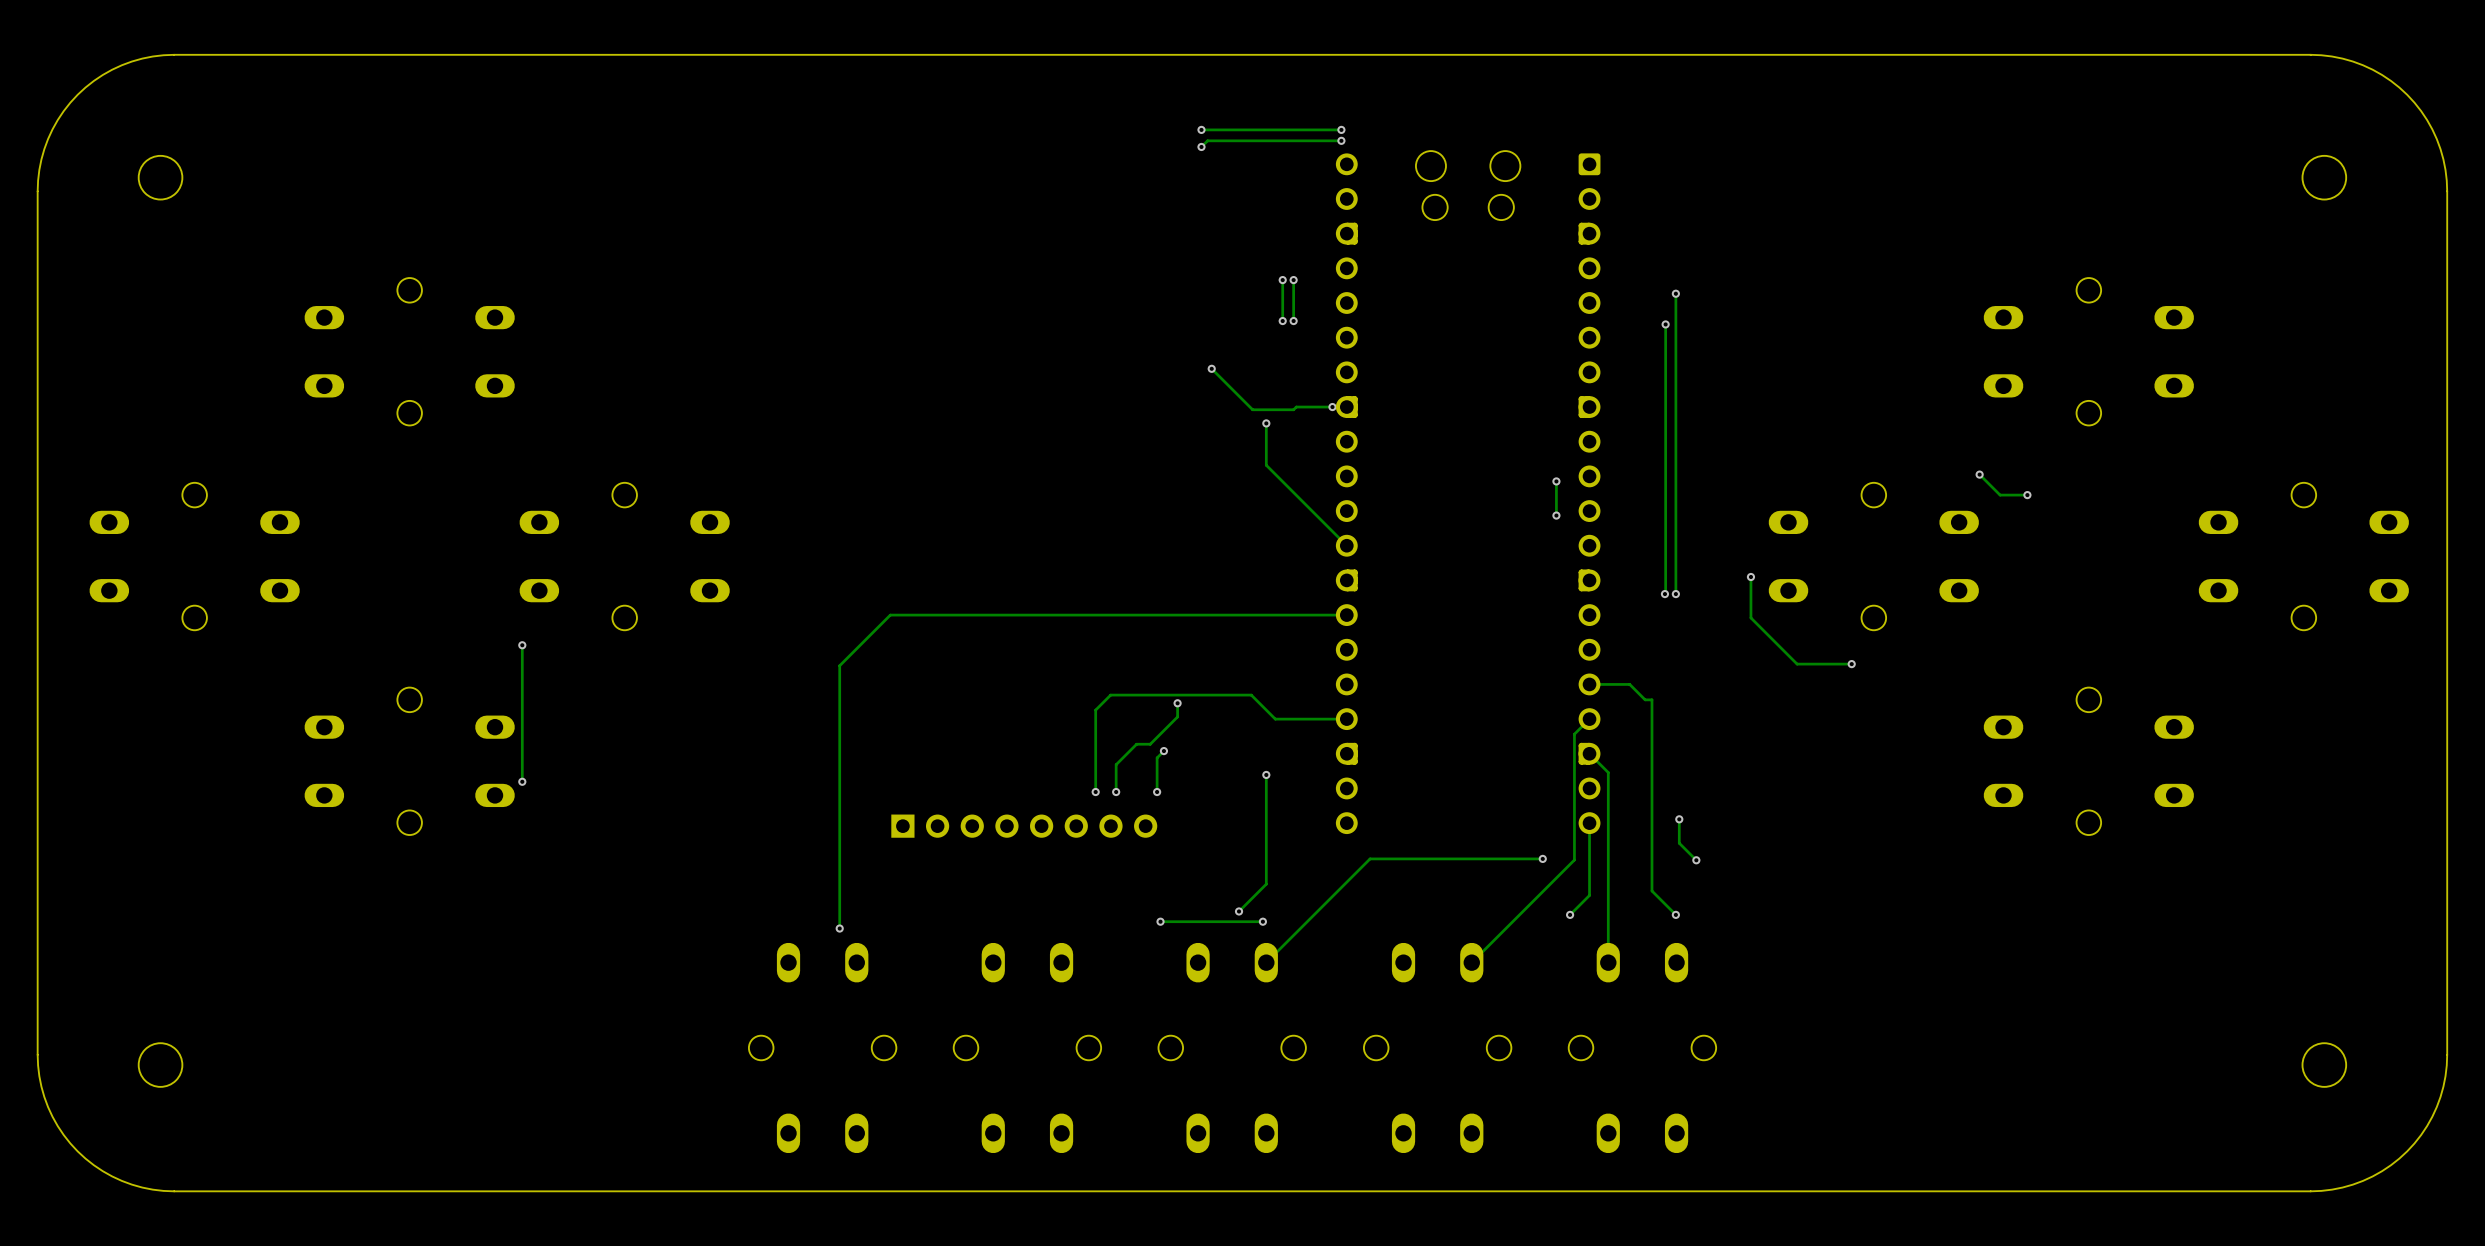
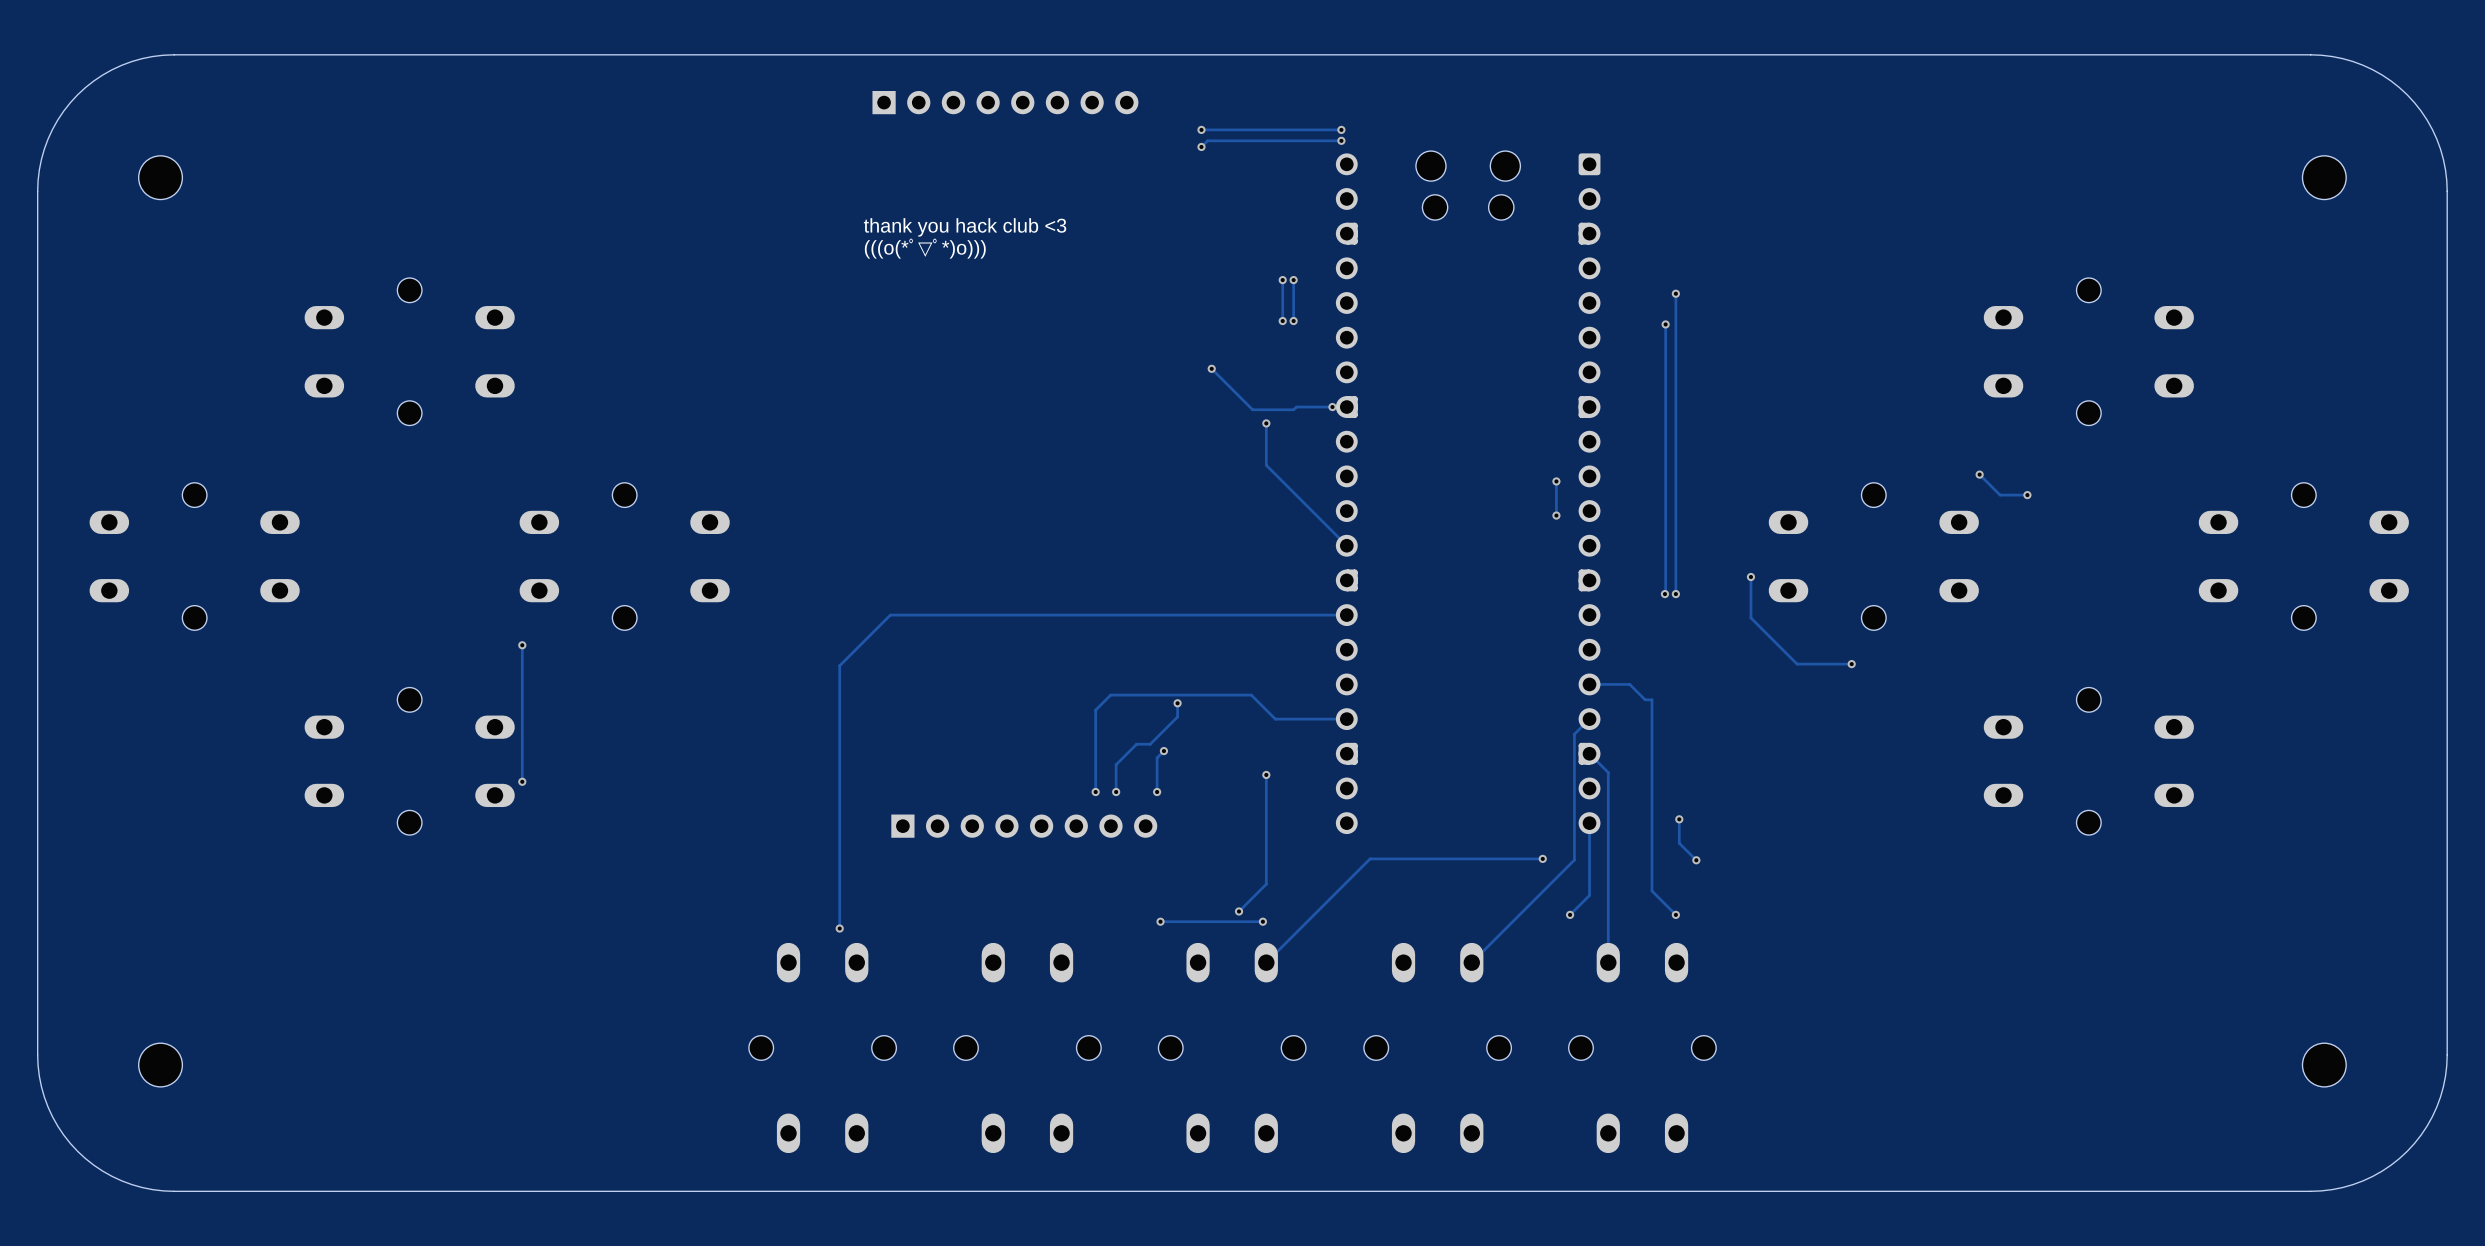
part: none -> (1005, 102)
text: none -> thank you hack club <3 (965, 227)
text: none -> (((o(*ﾟ▽ﾟ*)o))) (925, 248)

